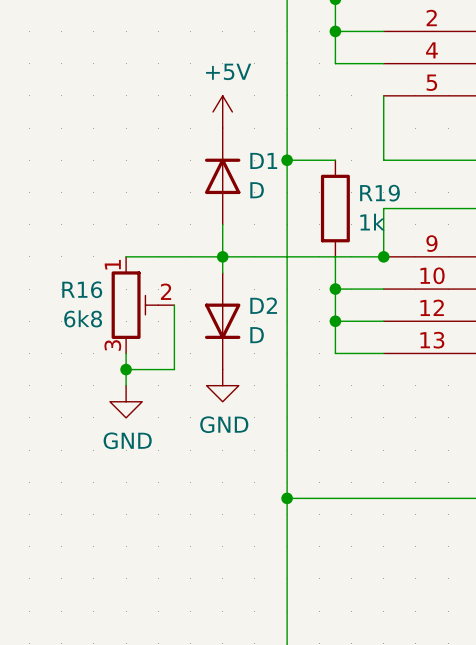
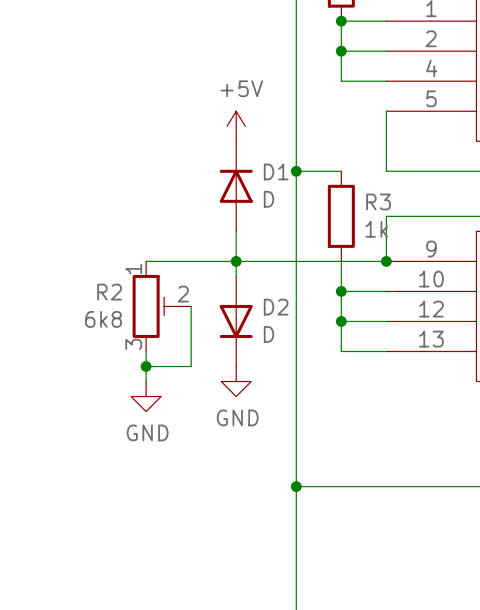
R19 name: R19 (379, 193) -> R3 (378, 201)
R16 name: R16 (82, 289) -> R2 (109, 292)

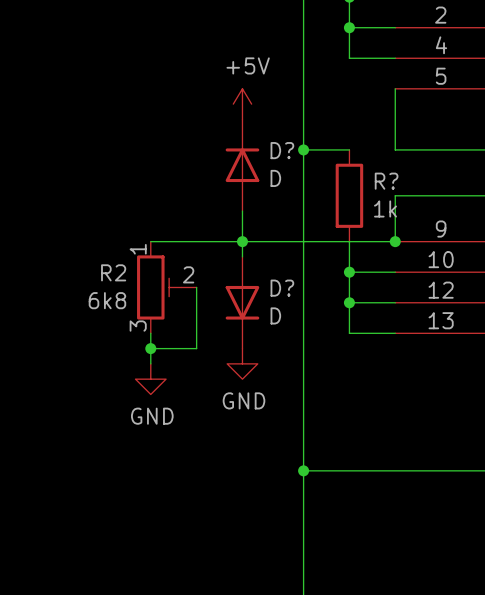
D1 name: D1 (276, 171) -> D? (282, 150)
R3 name: R3 (378, 201) -> R? (386, 181)
D2 name: D2 (276, 307) -> D? (282, 288)

